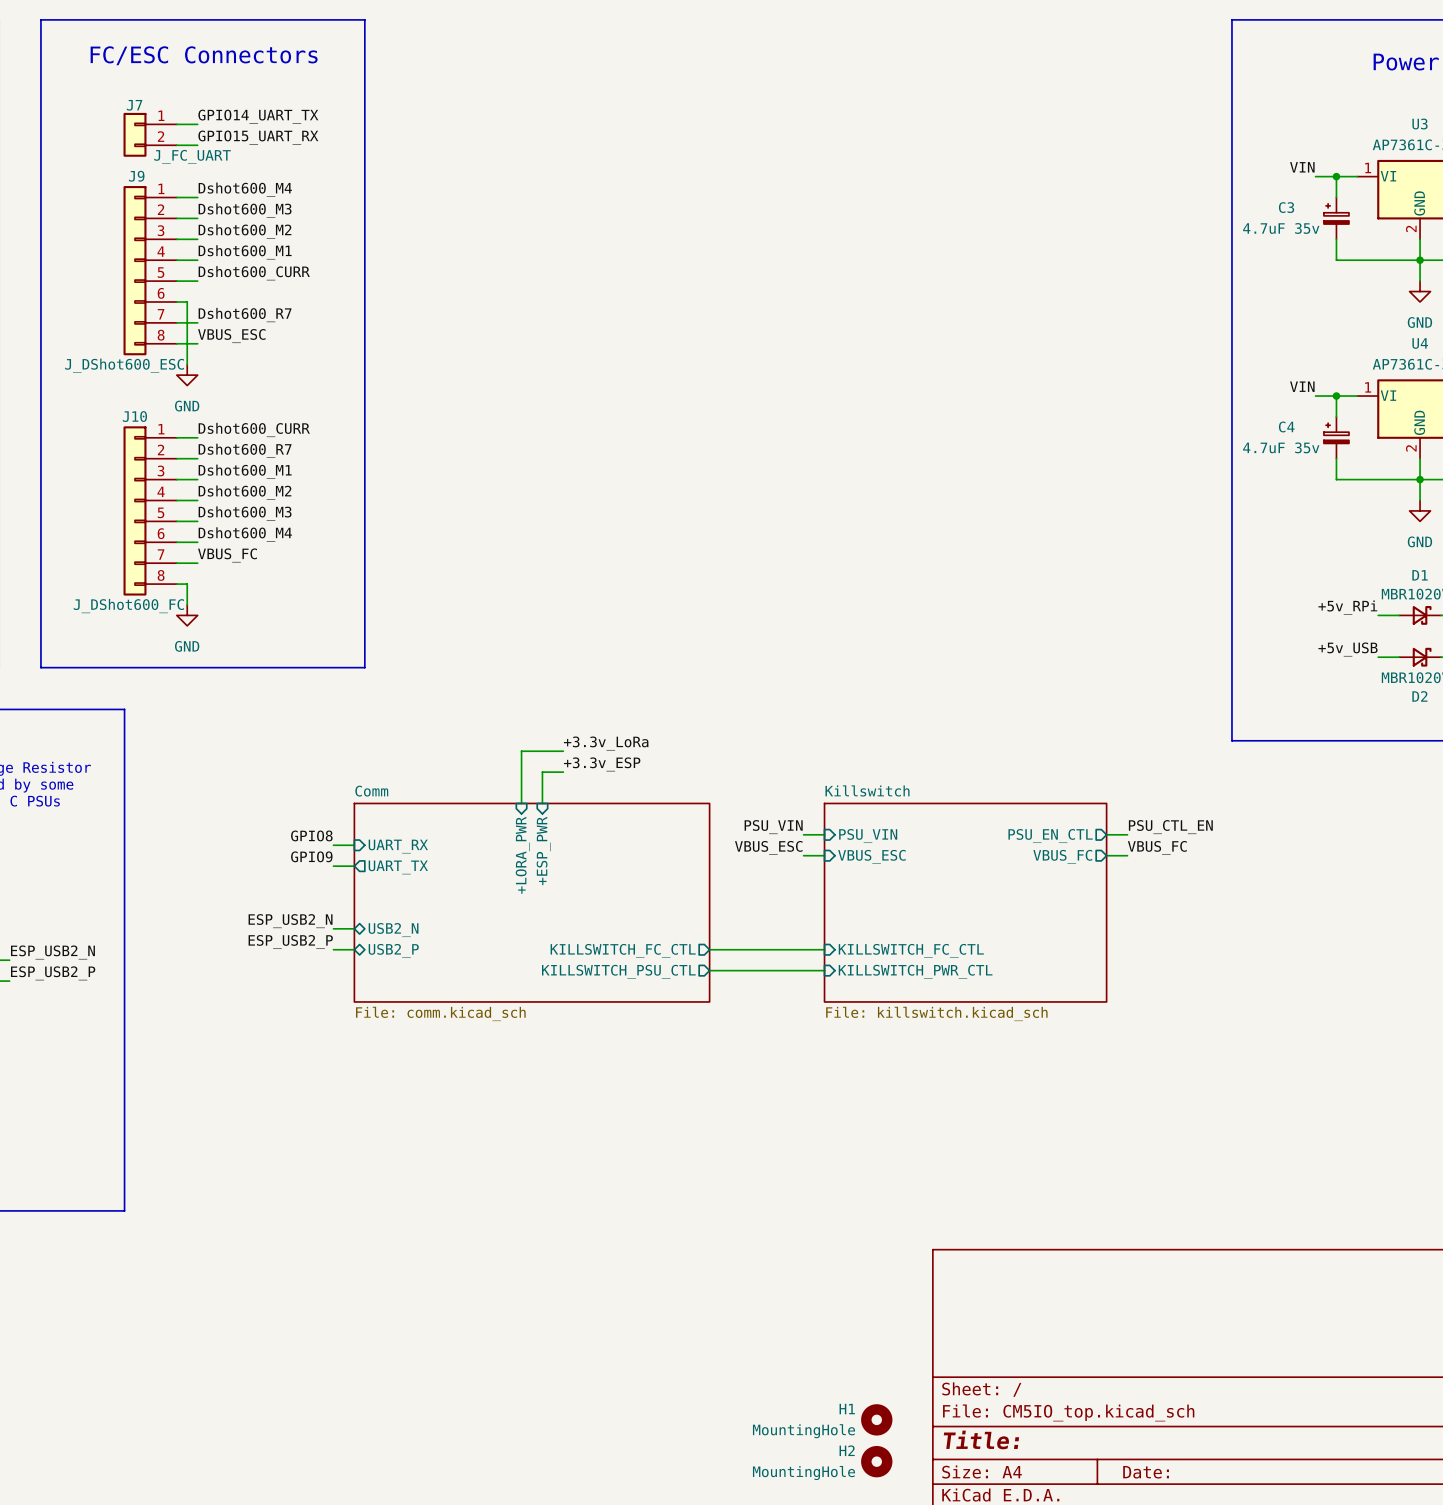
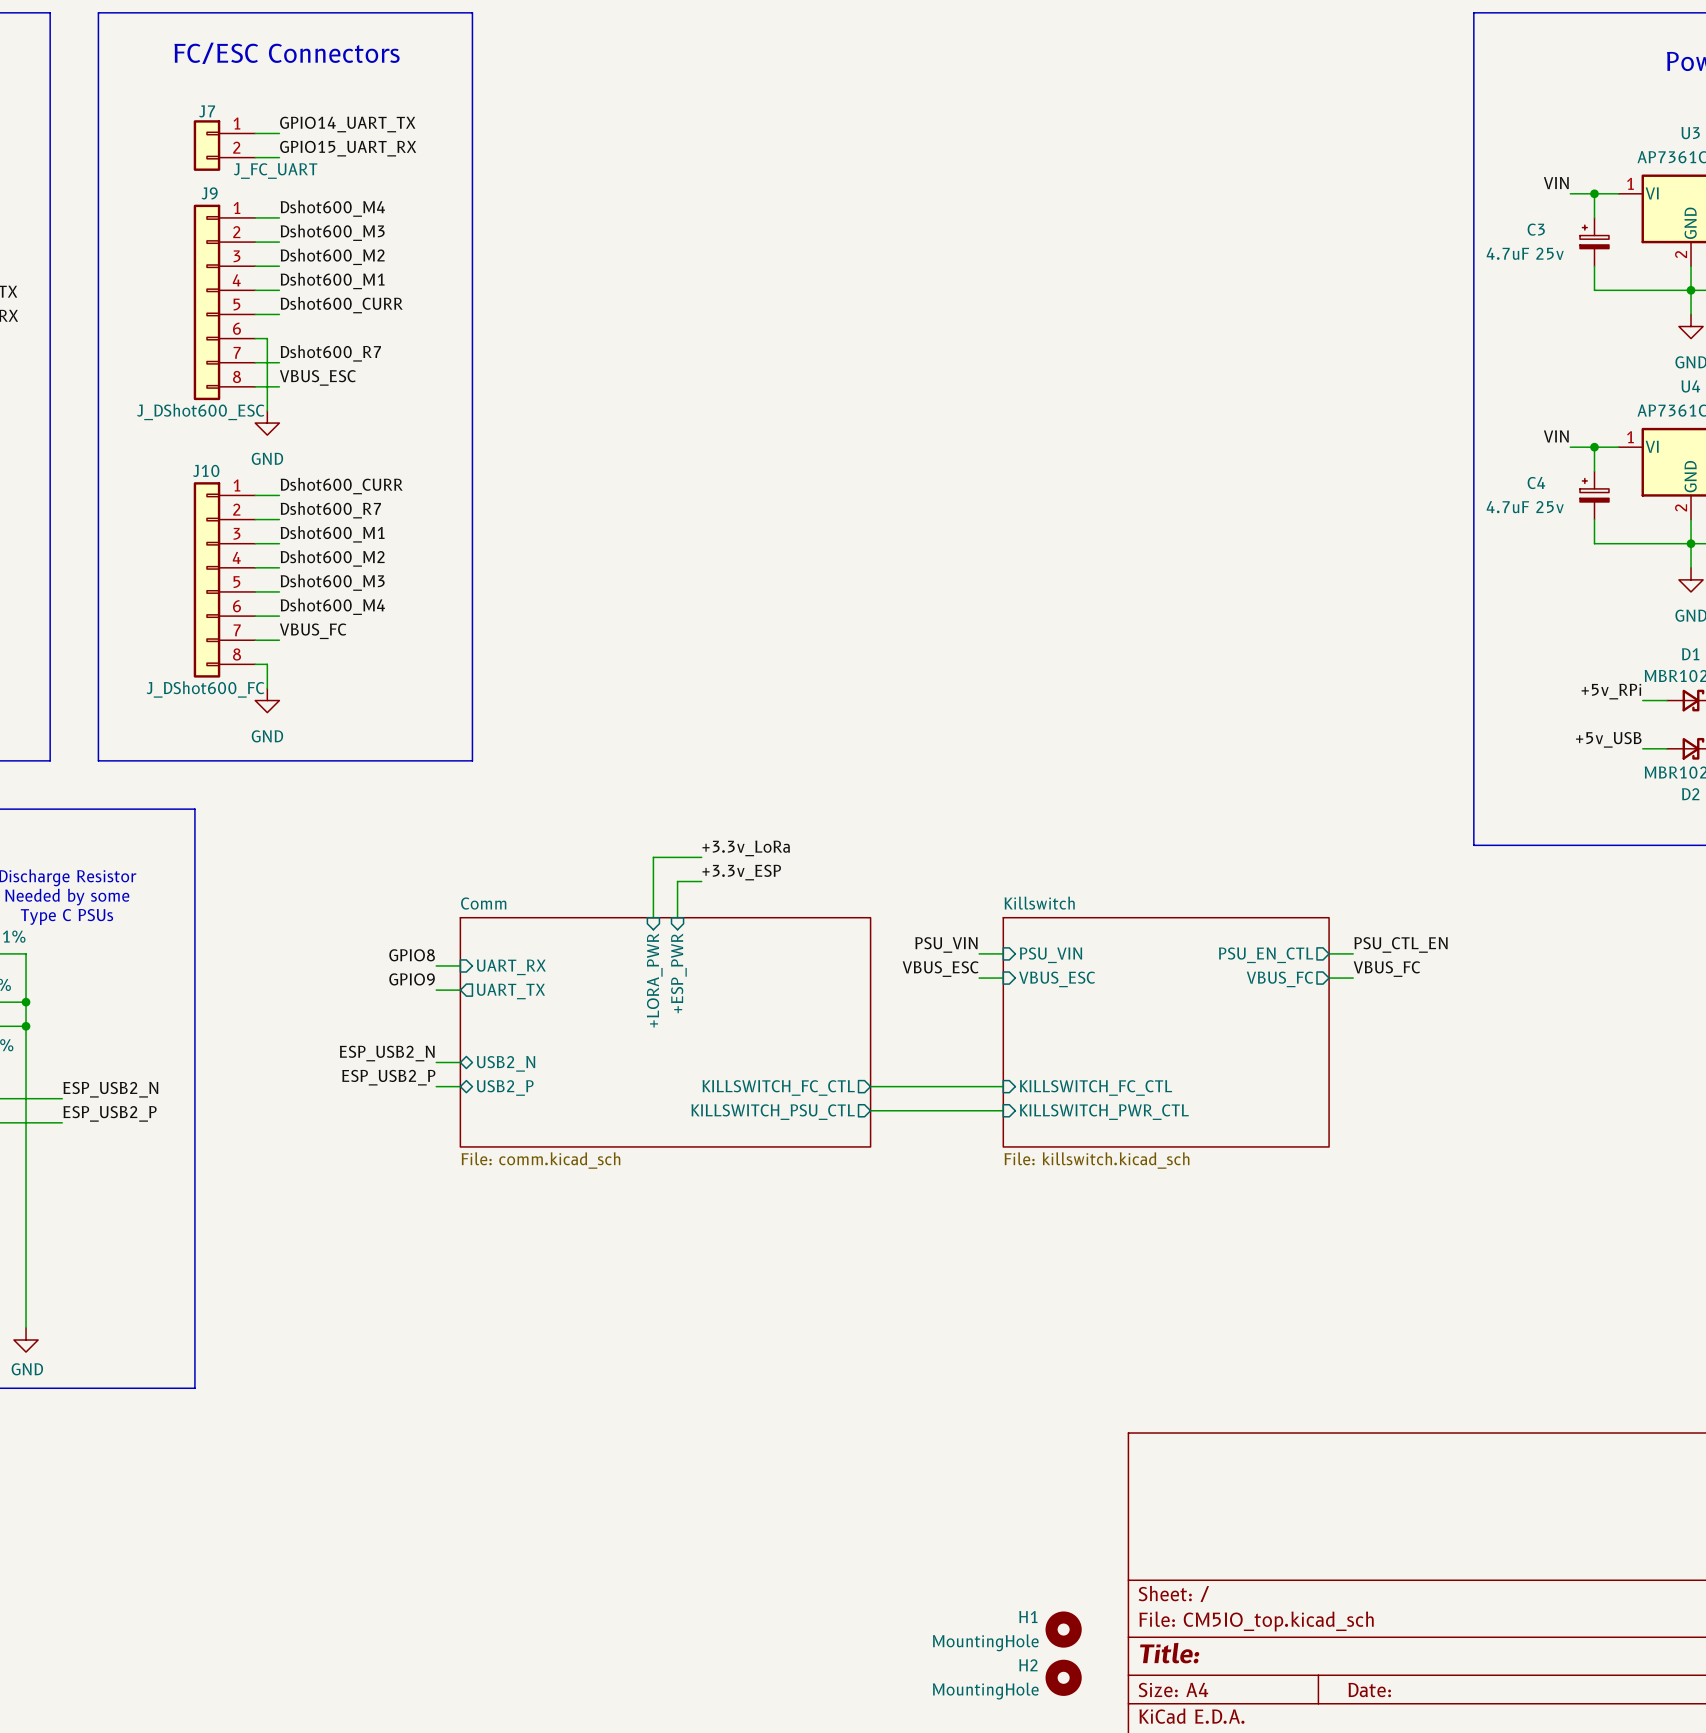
C3 value: 4.7uF 35v (1281, 228) -> 4.7uF 25v (1525, 253)
C4 value: 4.7uF 35v (1281, 447) -> 4.7uF 25v (1525, 507)

